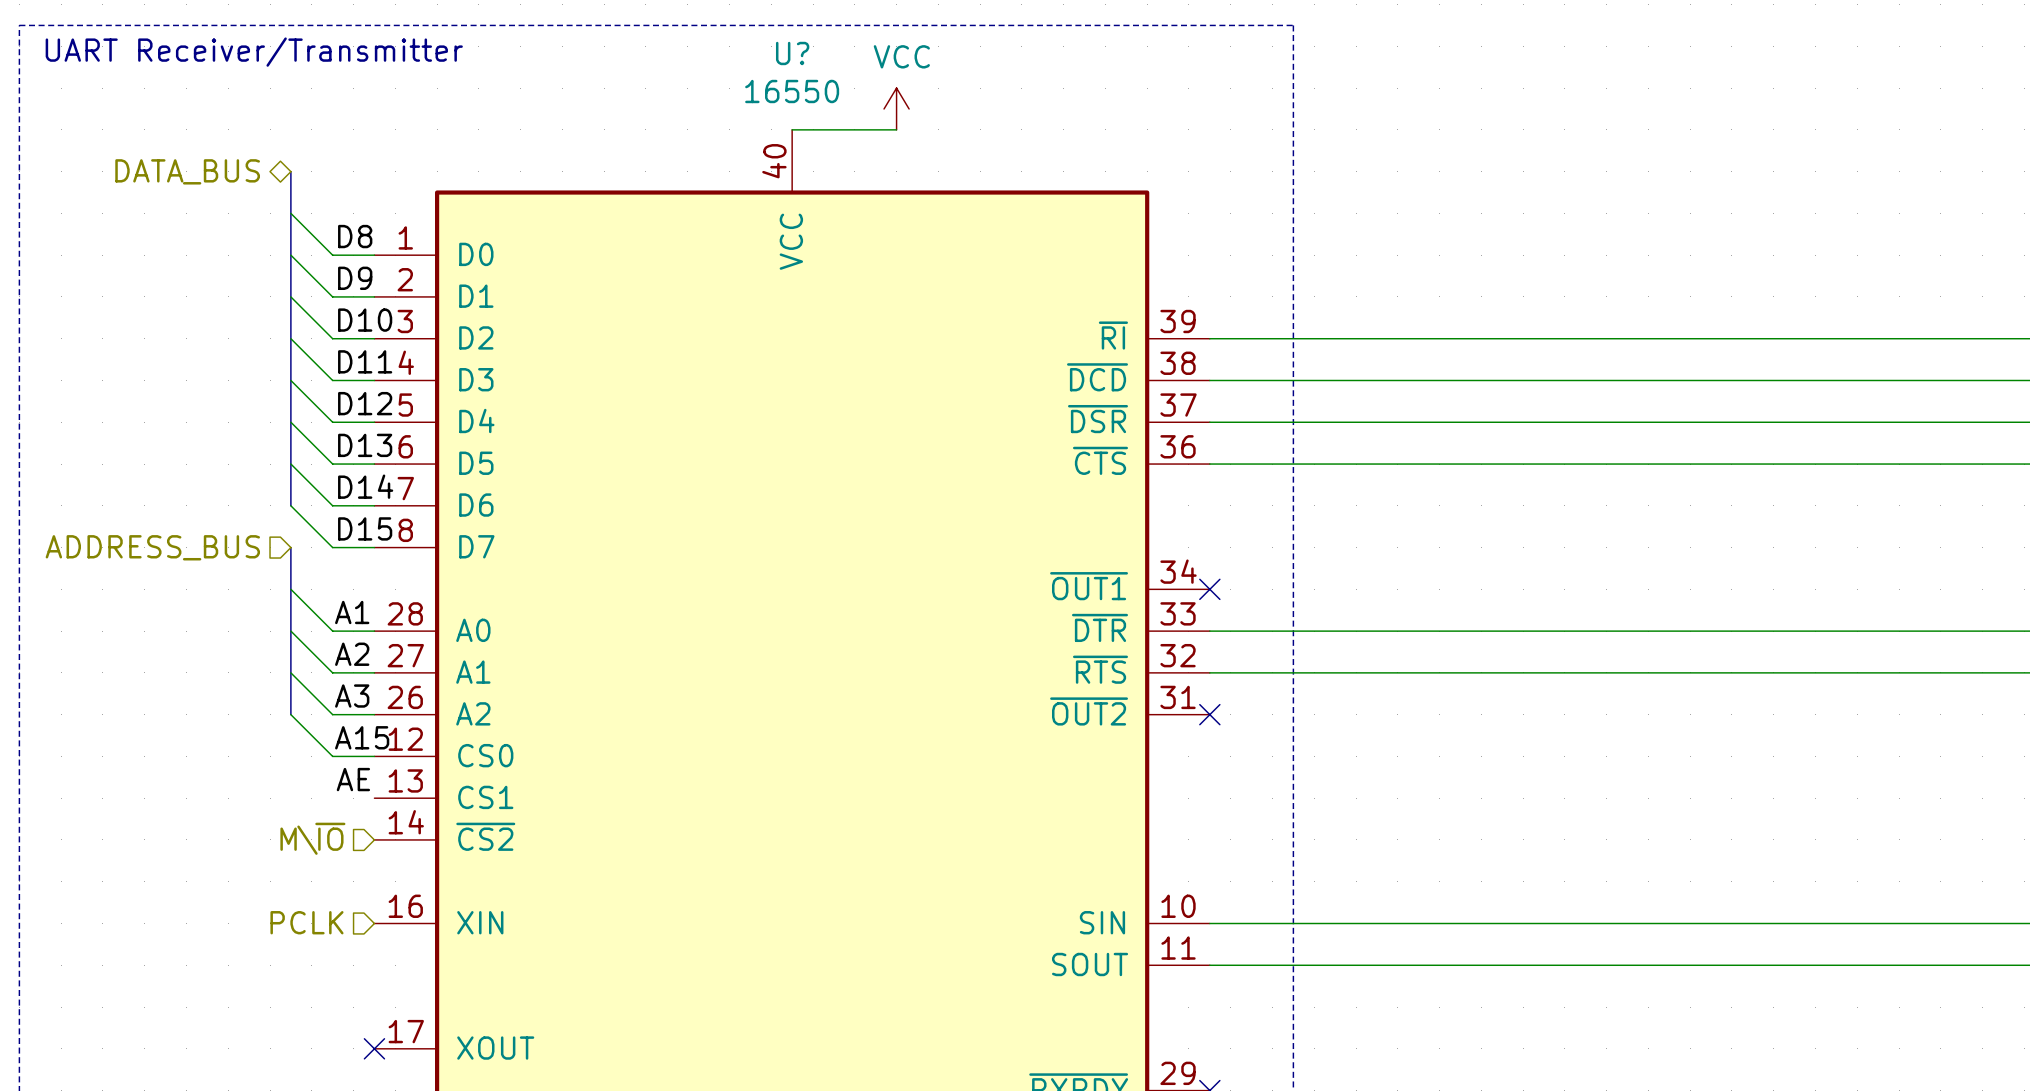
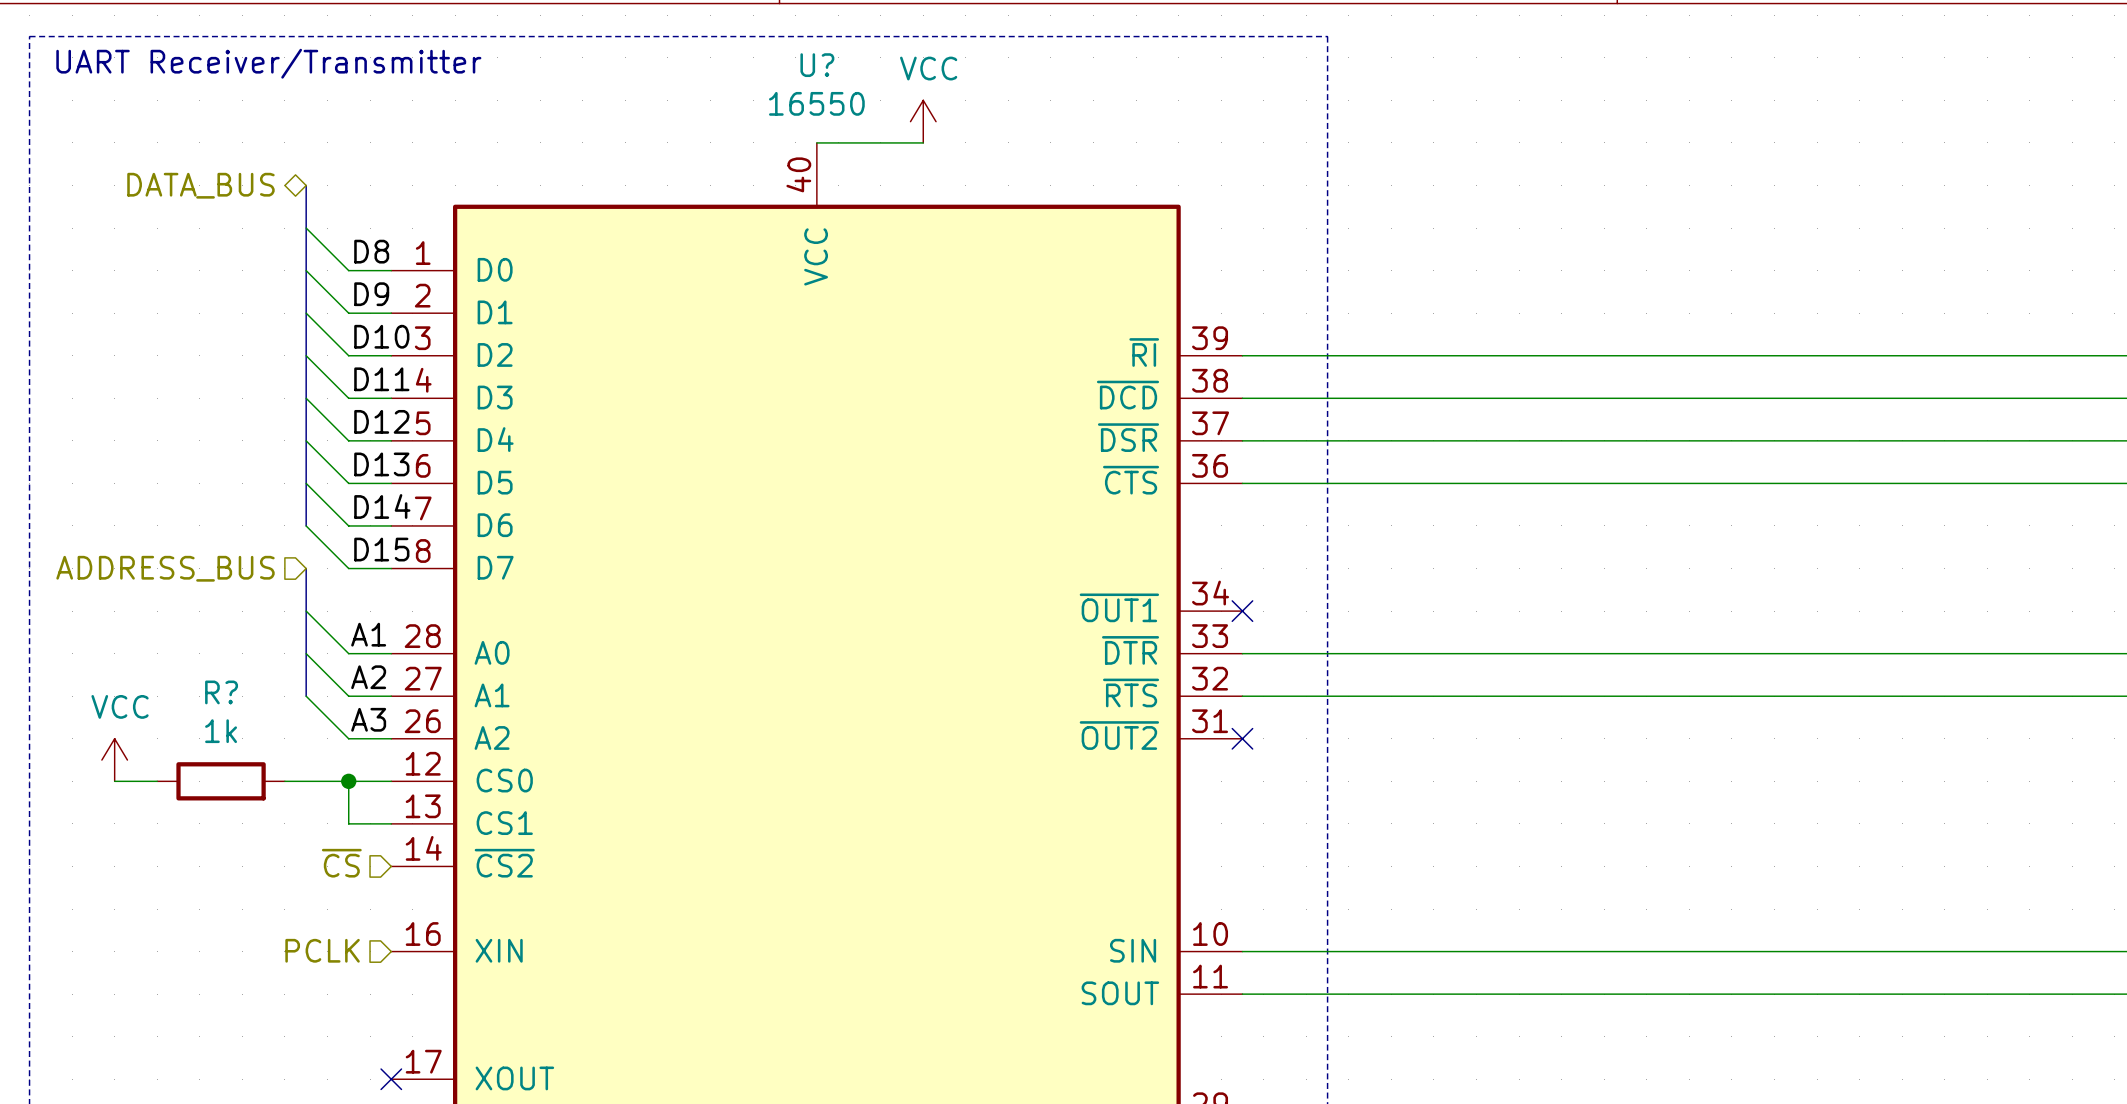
bus: (290, 672) (290, 714) -> none
wire: (290, 714) (332, 756) -> none
power symbol: none -> VCC (114, 760)
label: A15 (362, 737) -> none
wire: none -> (114, 781) (157, 781)
R?: none -> 1k (221, 781)
wire: none -> (284, 781) (348, 781) (348, 823) (391, 823)
junction: none -> (348, 781)
label: AE (353, 779) -> none
hierarchical label: M\~{IO} (312, 838) -> ~{CS} (341, 863)

